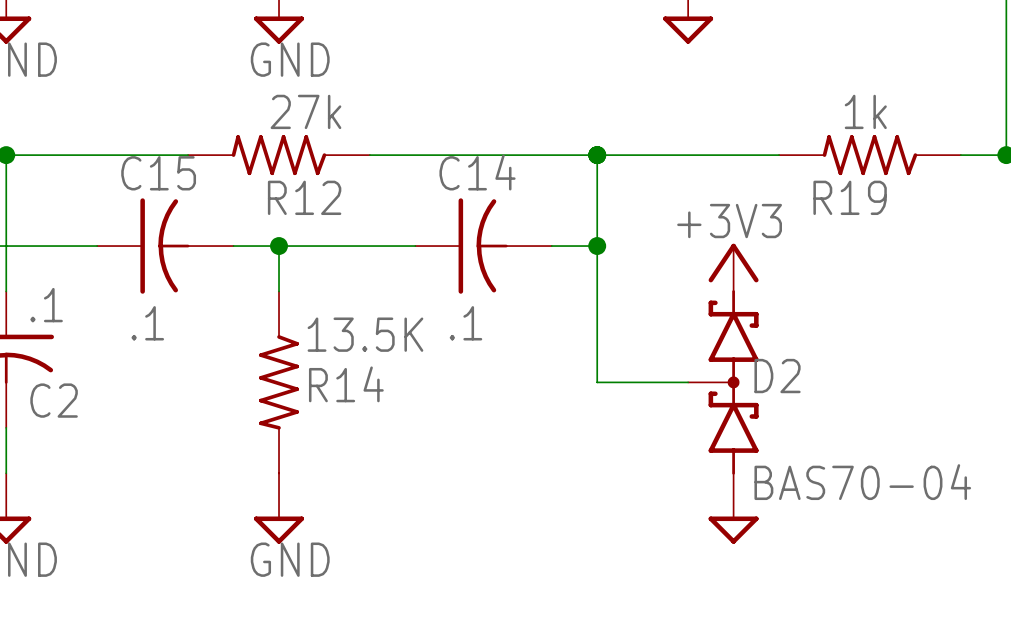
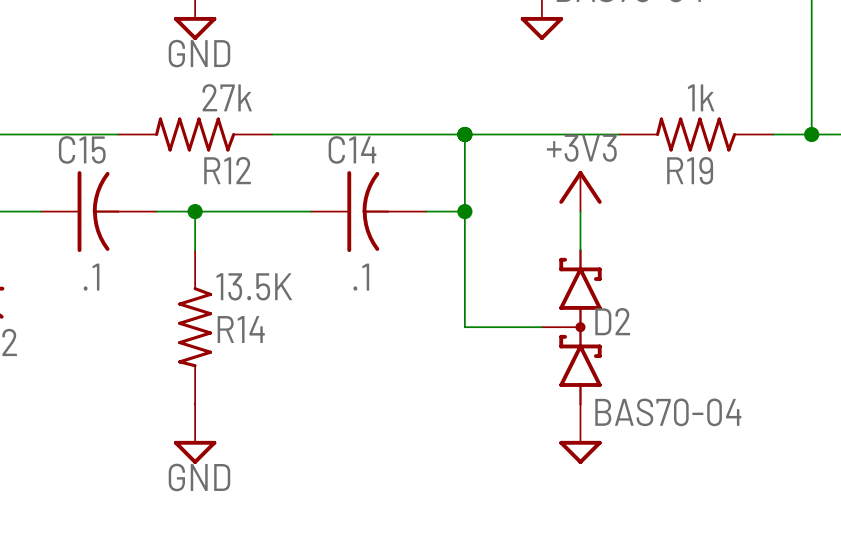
power symbol text position: +3V3 (729, 221) -> +3V3 (581, 148)
power symbol position: +3V3 (733, 267) -> +3V3 (580, 191)

